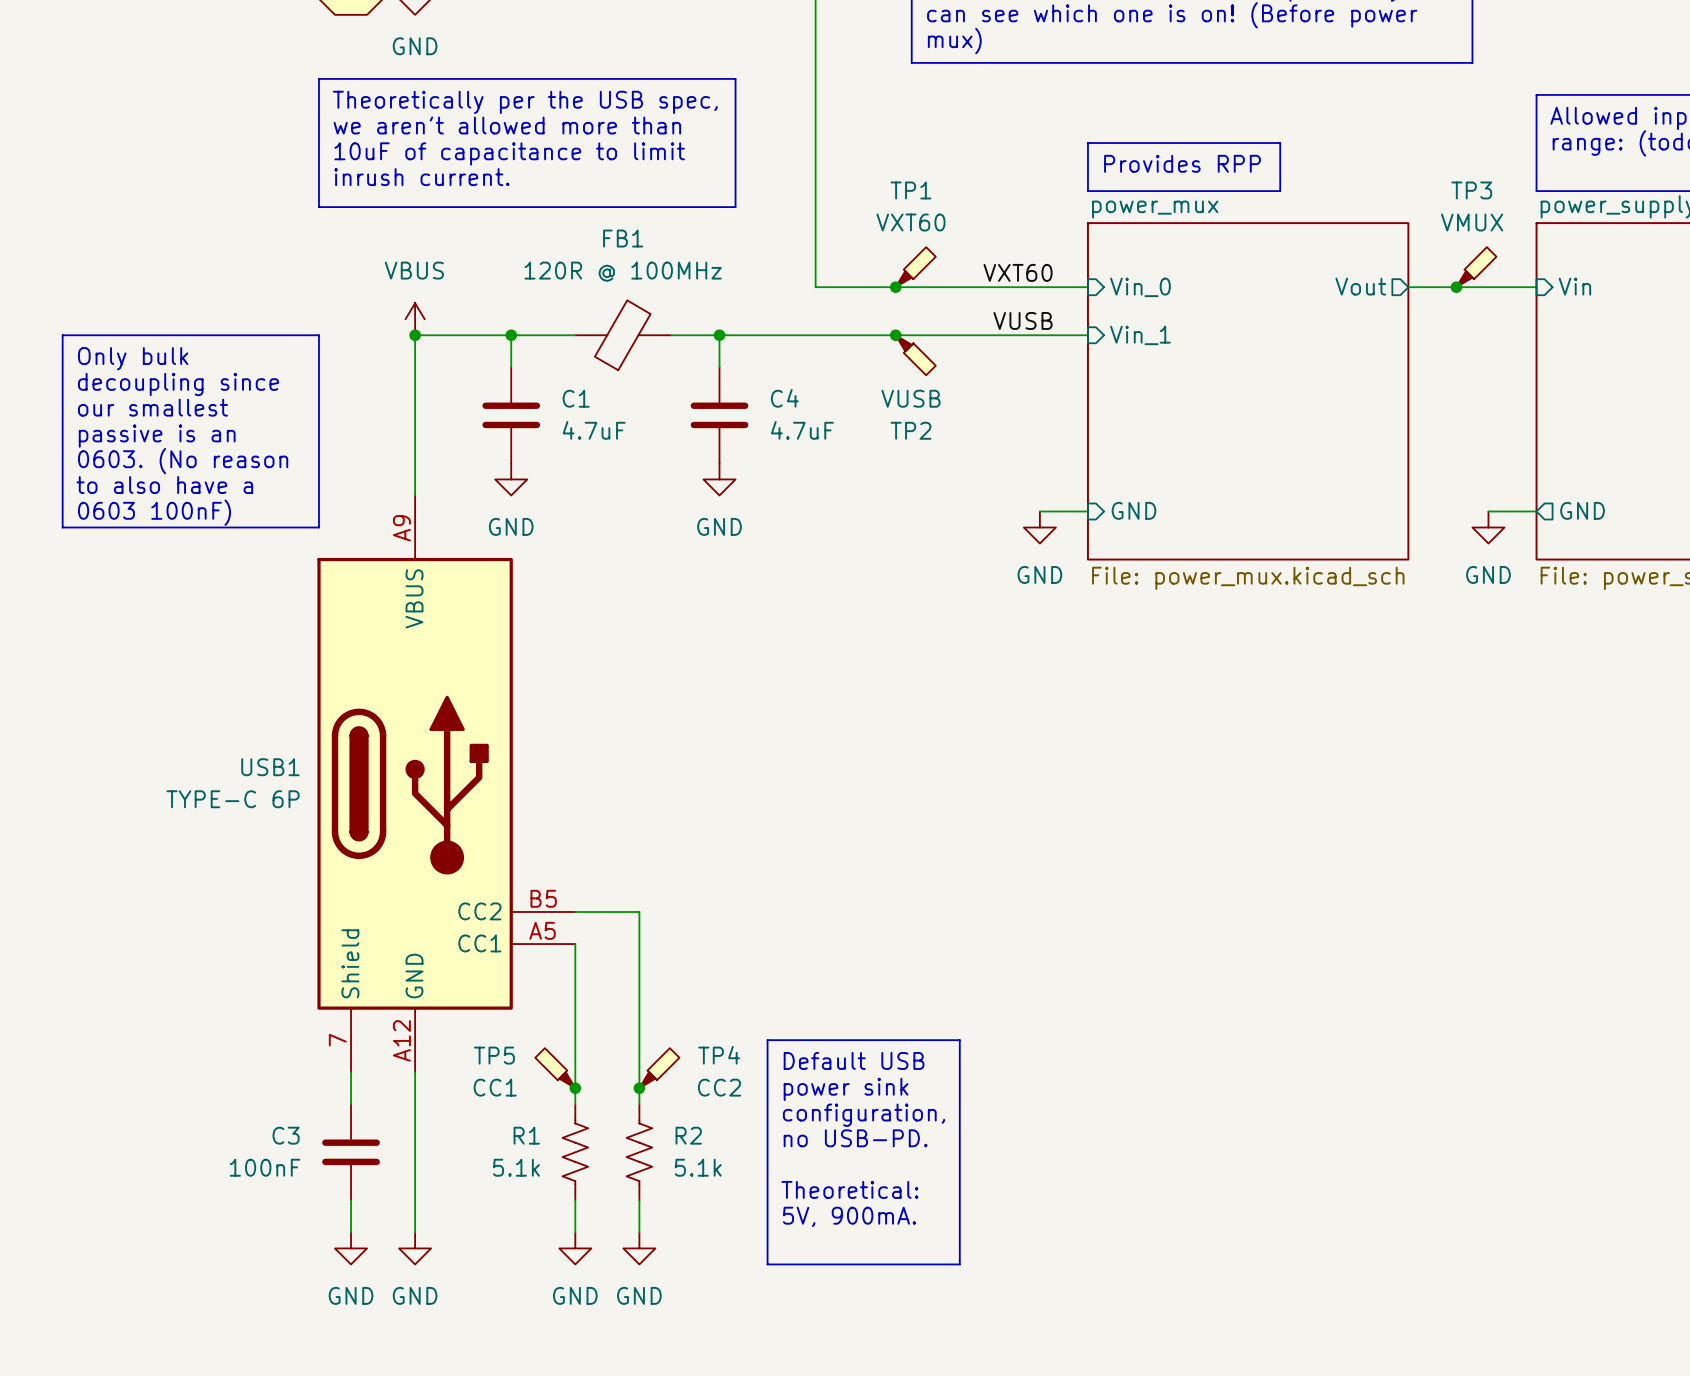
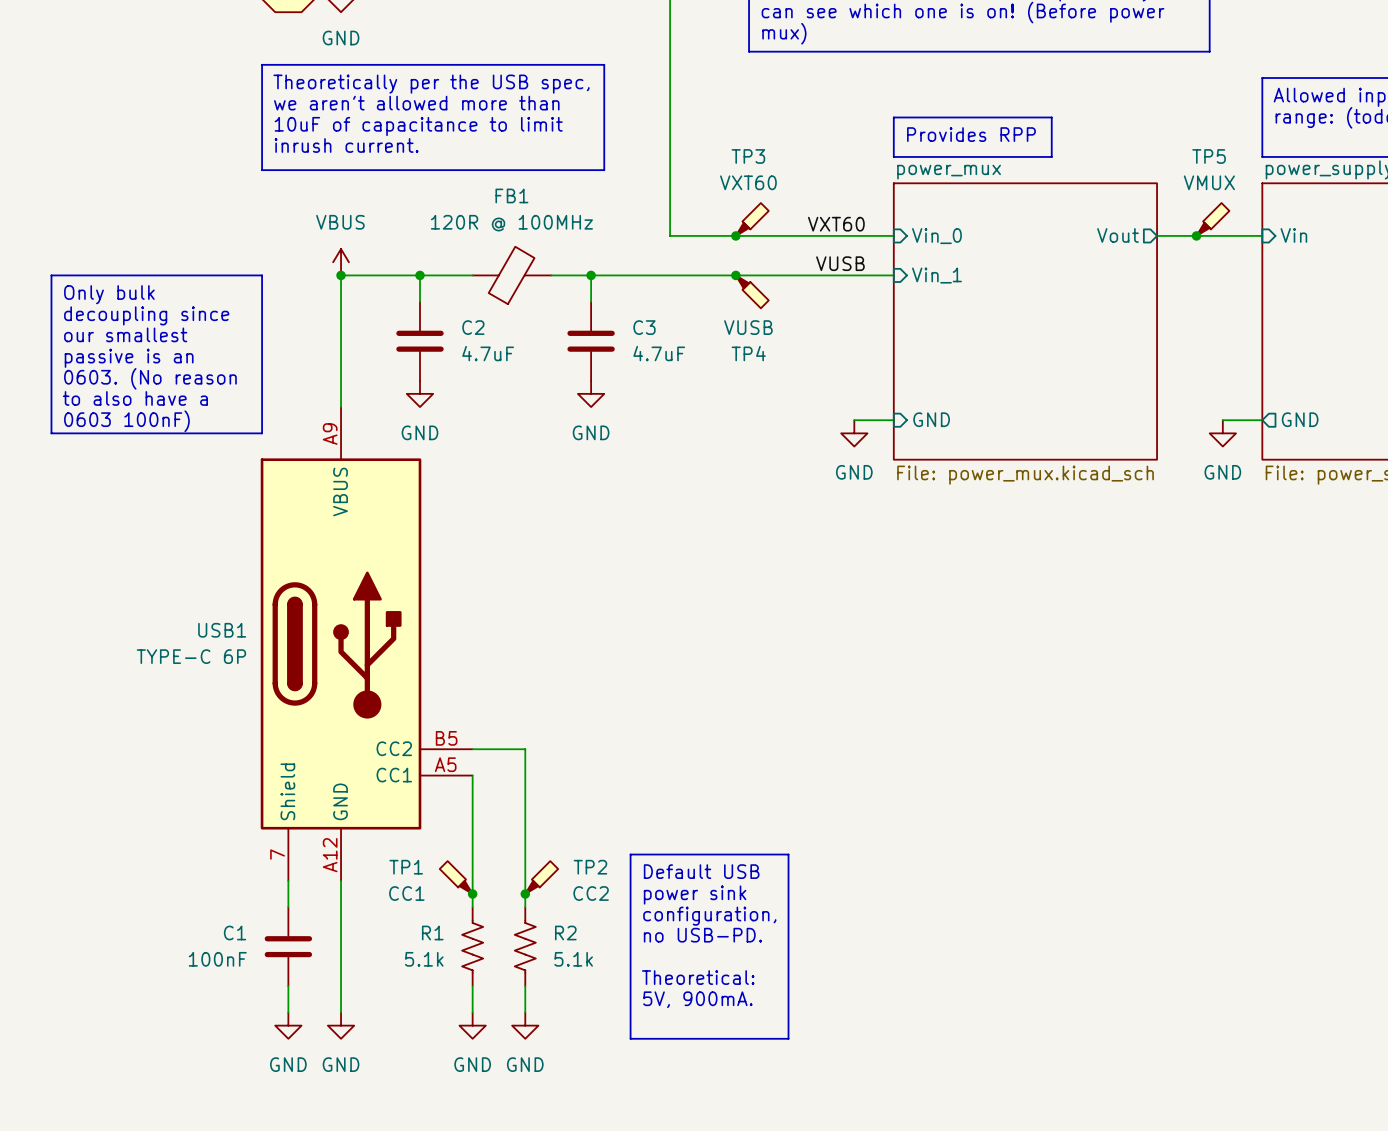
TP1 name: TP1 (910, 190) -> TP3 (748, 156)
TP3 name: TP3 (1471, 190) -> TP5 (1209, 156)
C1 name: C1 (576, 398) -> C2 (473, 327)
C4 name: C4 (784, 398) -> C3 (644, 327)
TP2 name: TP2 (910, 430) -> TP4 (748, 353)
TP5 name: TP5 (494, 1055) -> TP1 (406, 867)
TP4 name: TP4 (719, 1055) -> TP2 (590, 867)
C3 name: C3 (286, 1135) -> C1 (235, 933)

